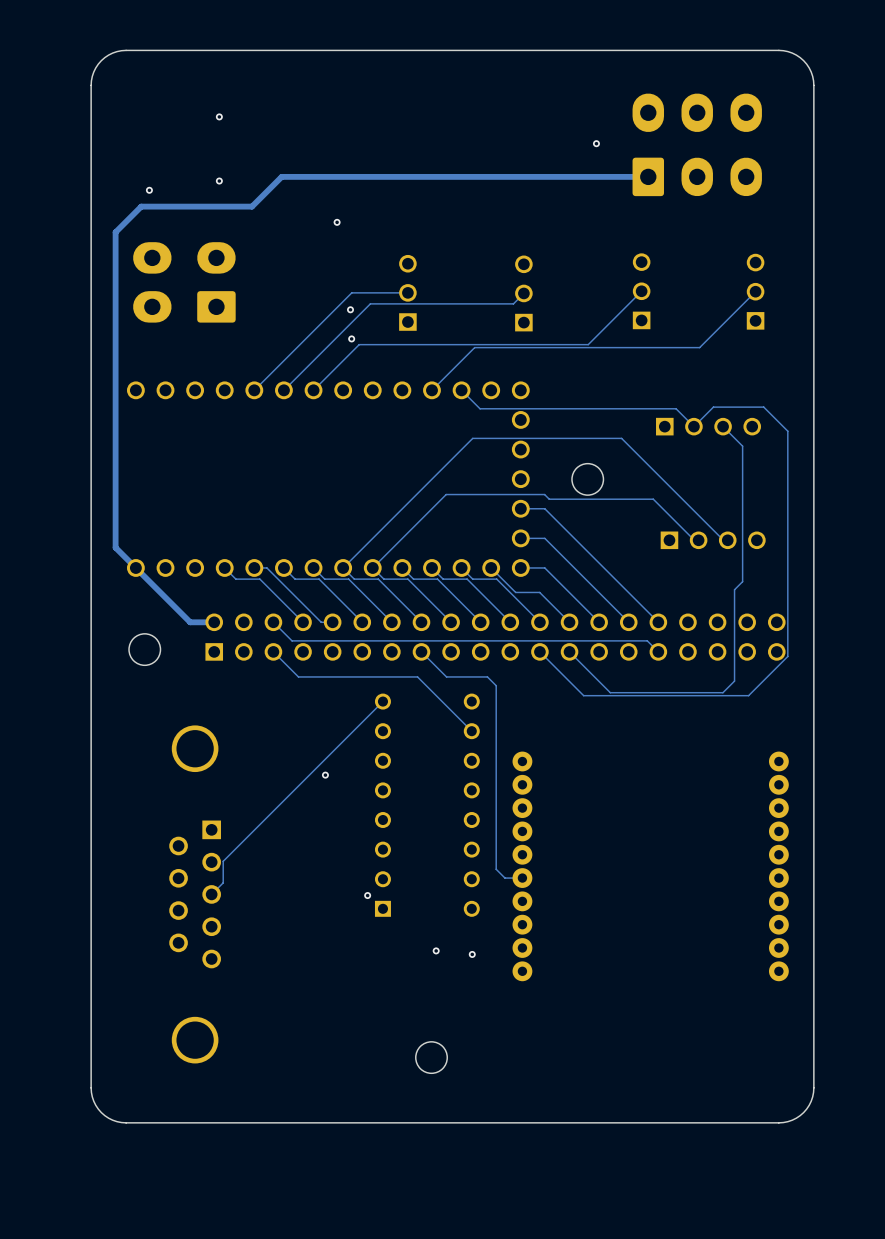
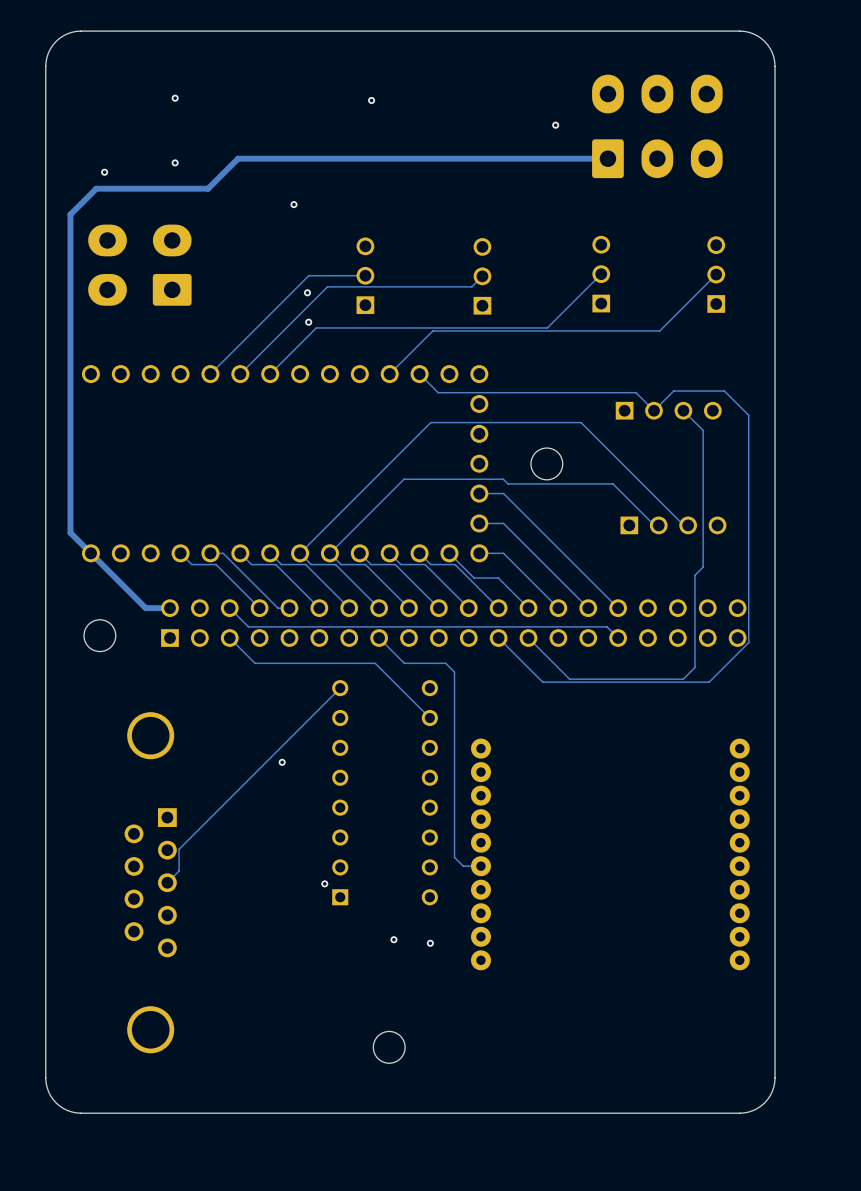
via: none -> (371, 100)

